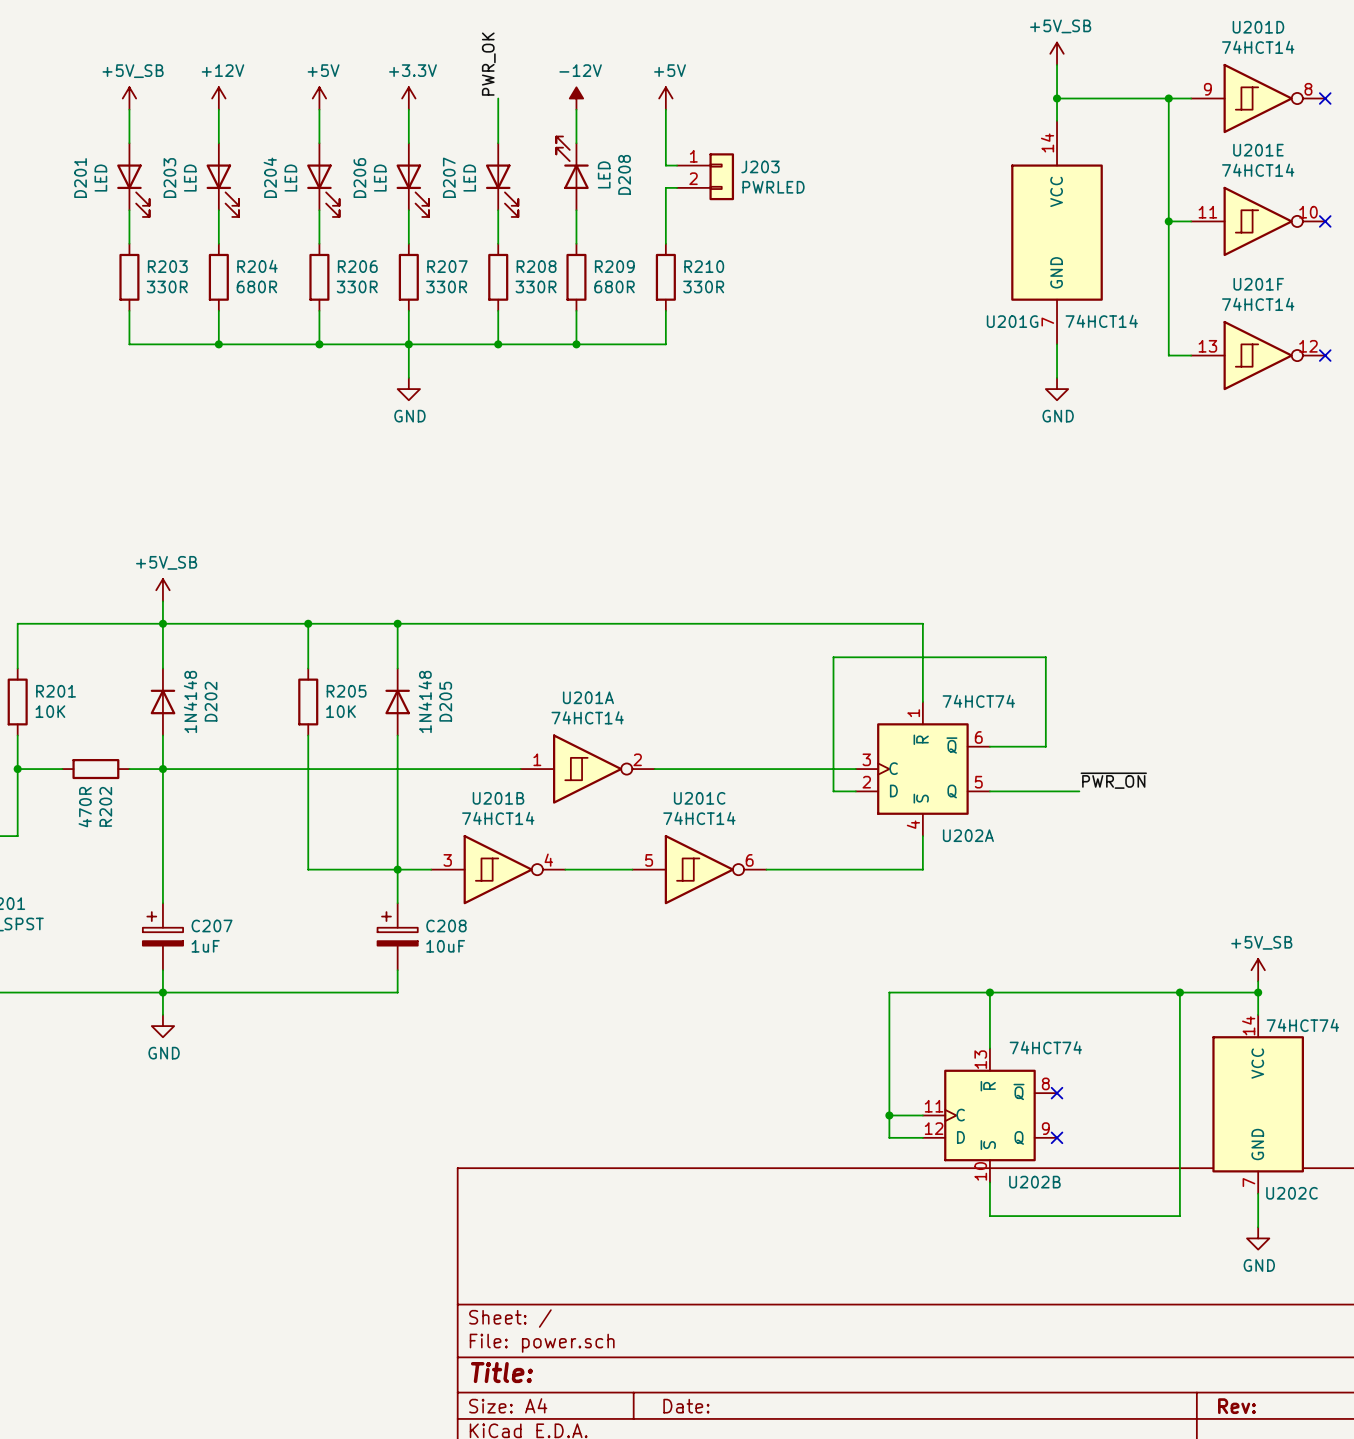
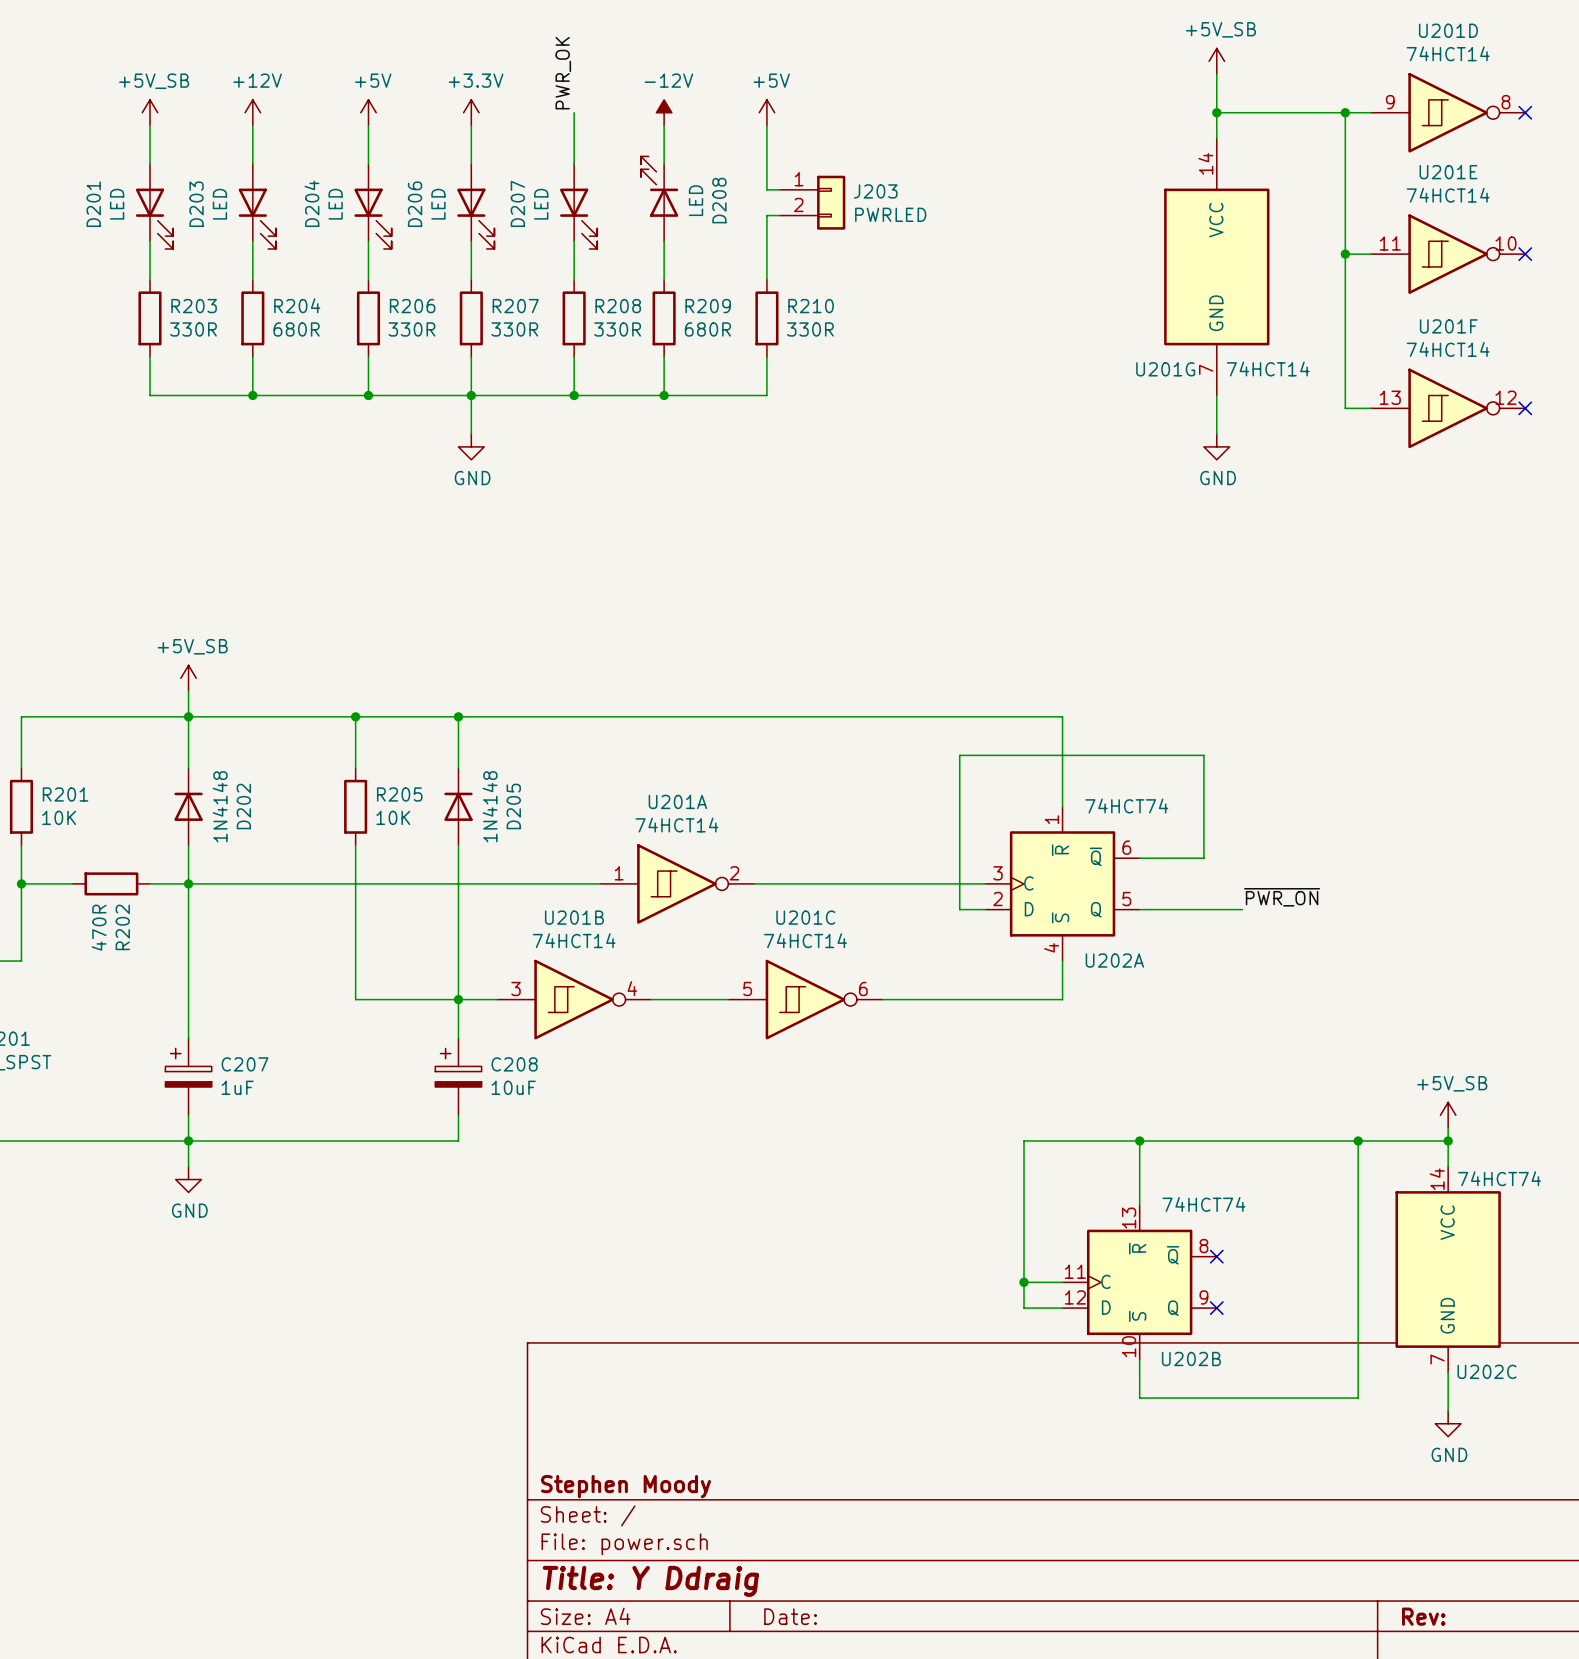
title block: none -> Stephen Moody (626, 1486)
title block: Title: (501, 1372) -> Title: Y Ddraig (650, 1581)

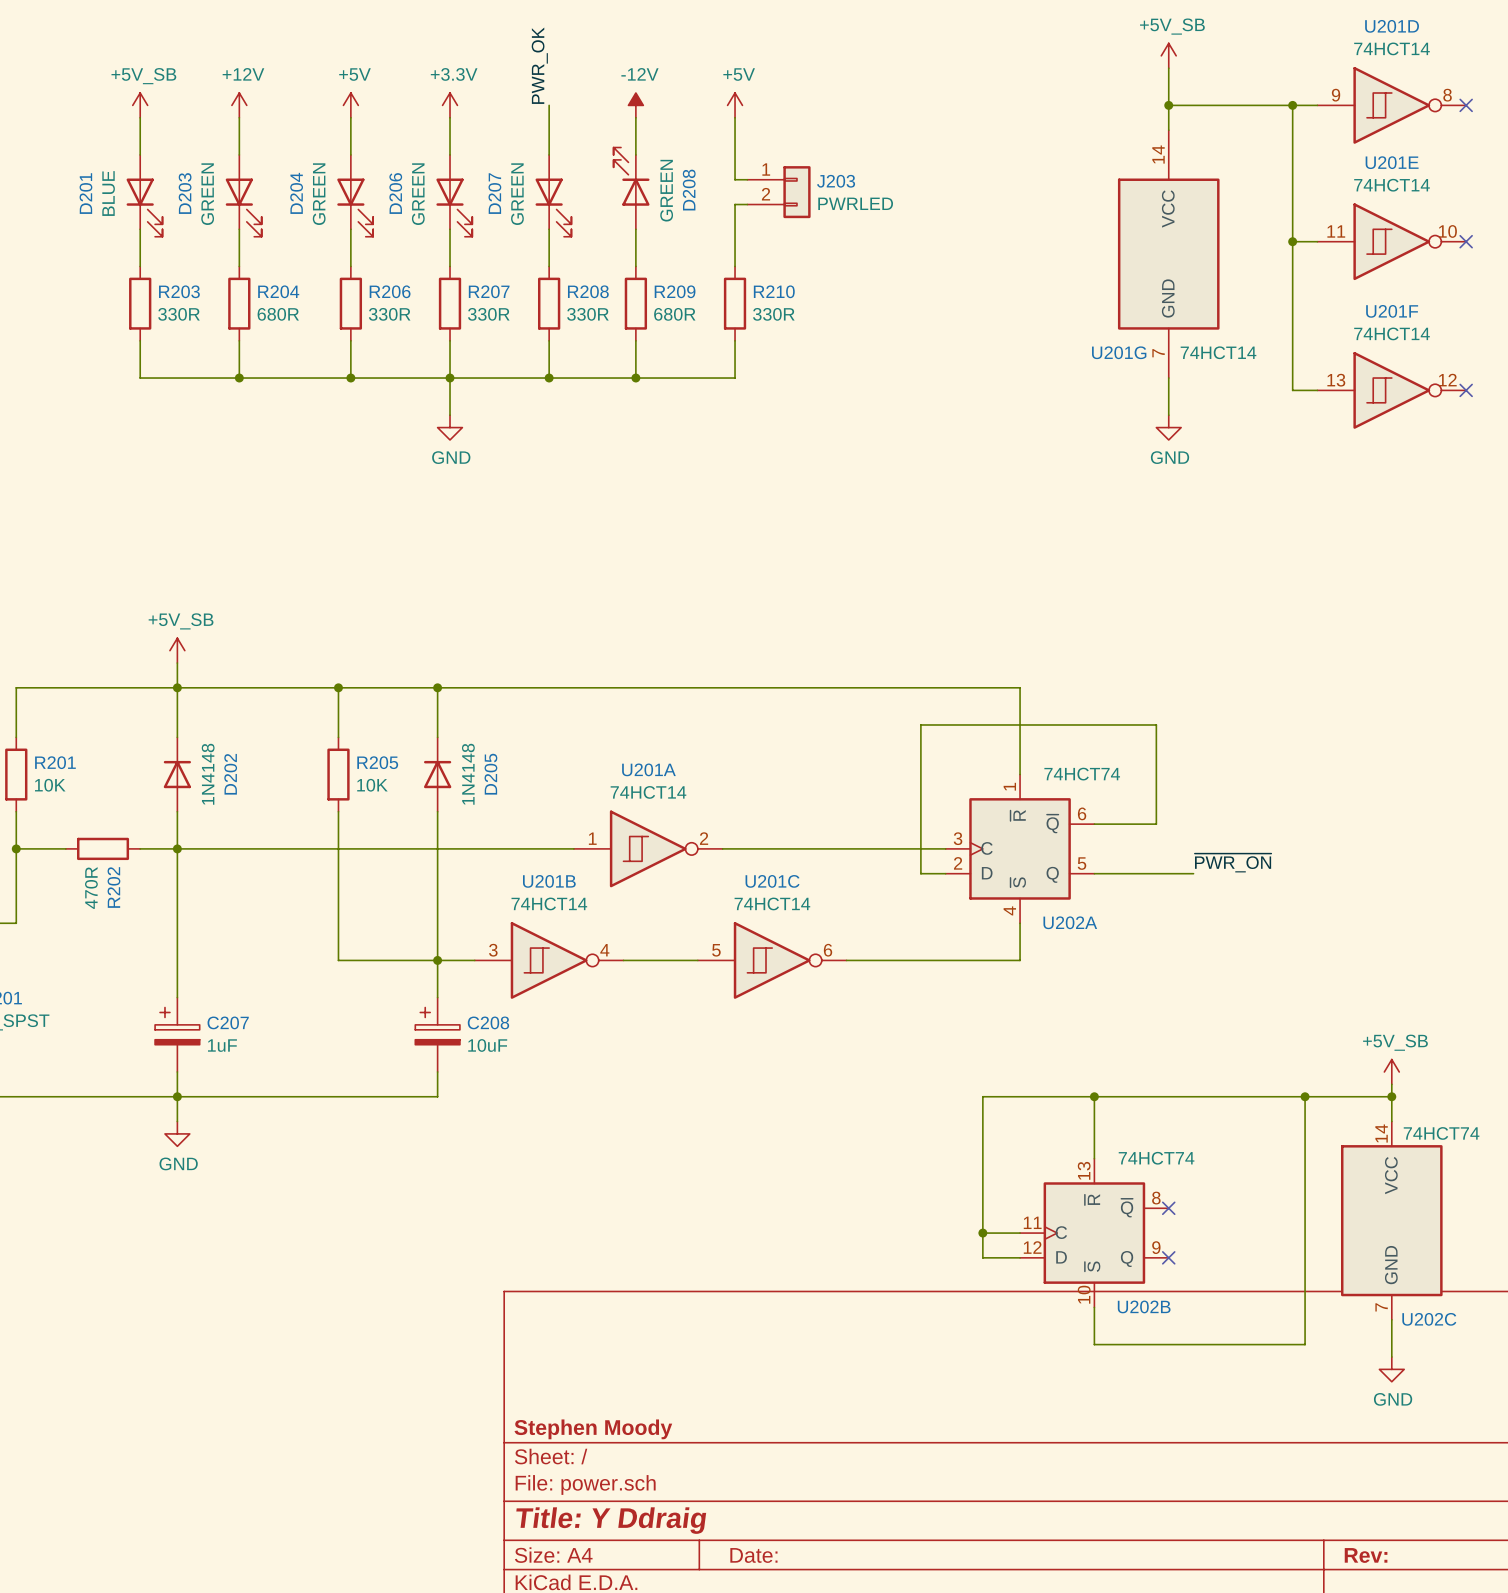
D208 value: LED (696, 200) -> GREEN (666, 190)
D201 value: LED (117, 204) -> BLUE (108, 193)
D203 value: LED (219, 204) -> GREEN (207, 194)
D204 value: LED (335, 204) -> GREEN (319, 194)
D206 value: LED (438, 204) -> GREEN (418, 194)
D207 value: LED (541, 204) -> GREEN (517, 194)

